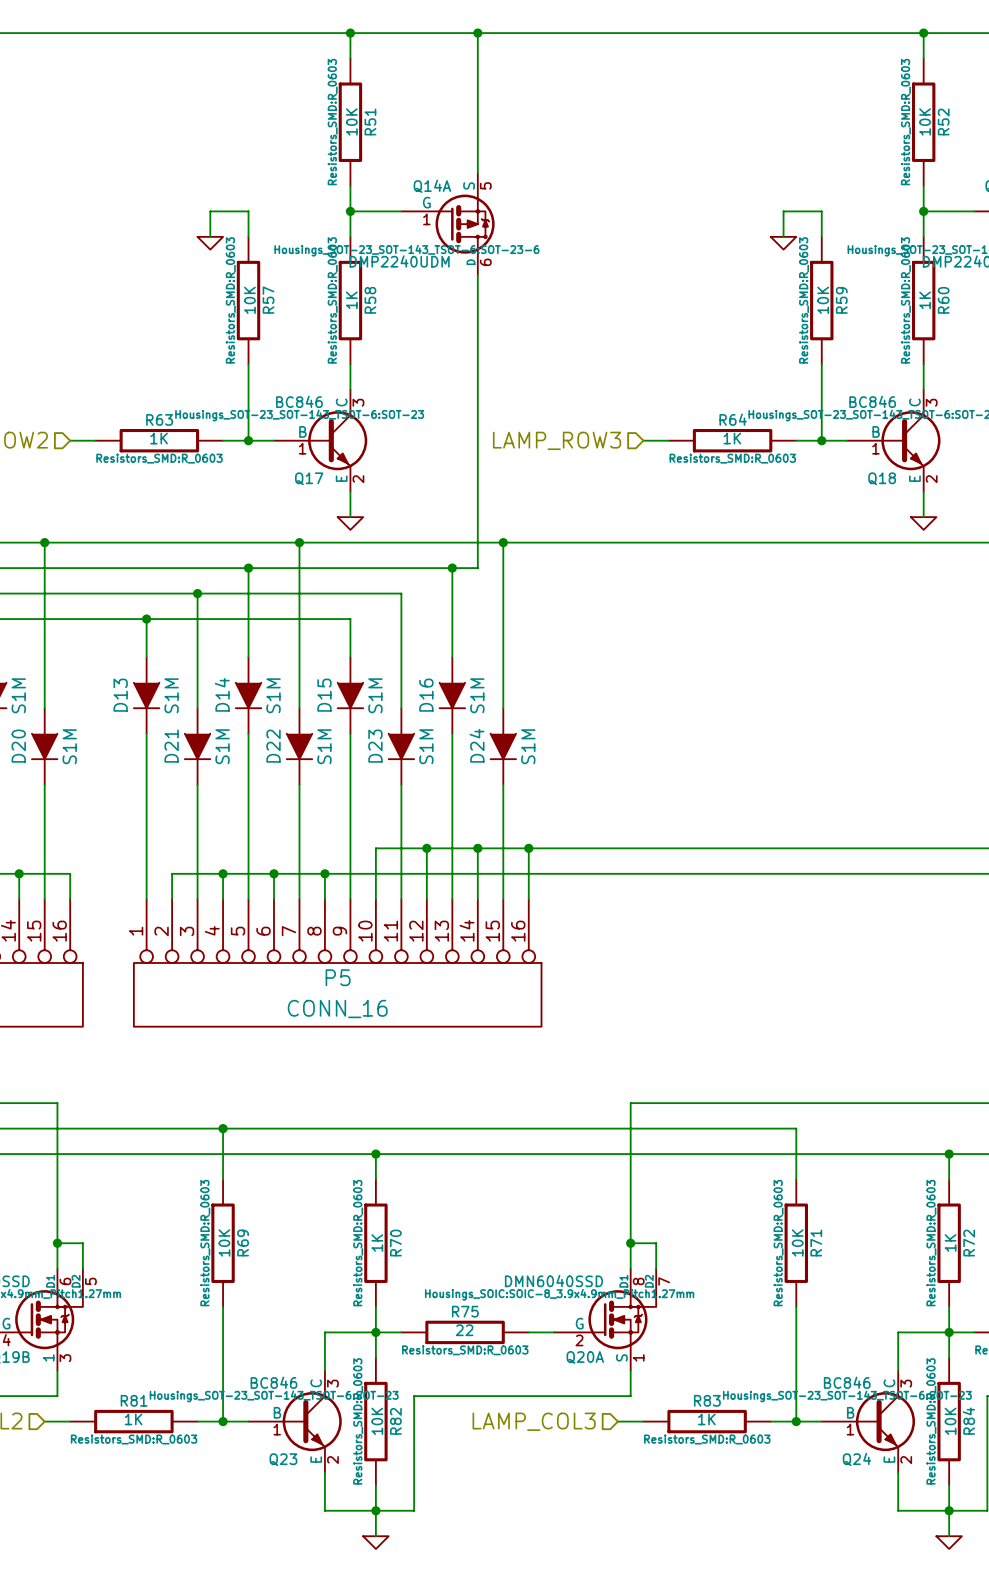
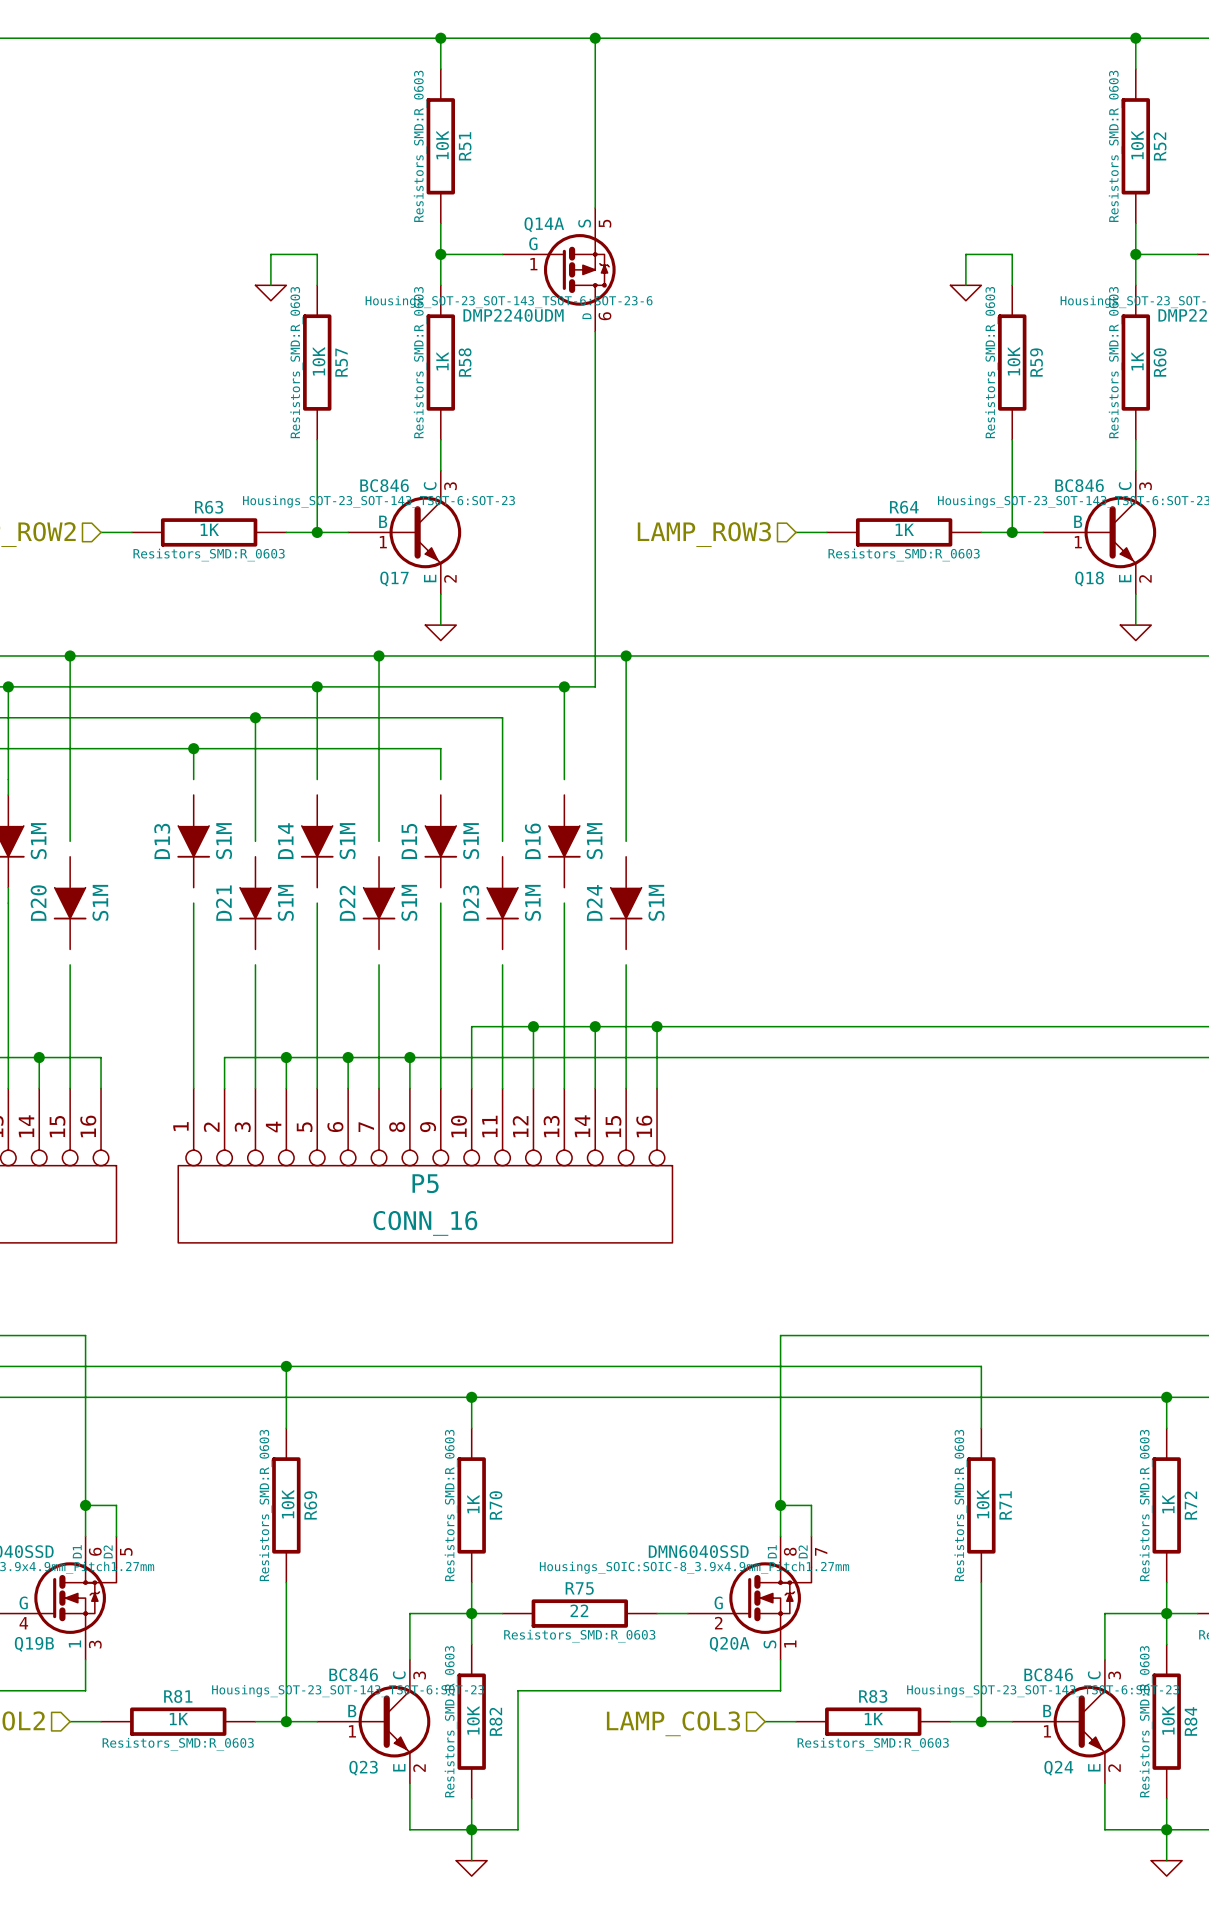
wire: (146, 644) (146, 657) -> none
wire: (248, 644) (248, 657) -> none
wire: (350, 644) (350, 657) -> none
wire: (452, 644) (452, 657) -> none
wire: (44, 695) (44, 708) -> none
wire: (197, 695) (197, 708) -> none
wire: (299, 695) (299, 708) -> none
wire: (401, 695) (401, 708) -> none
wire: (503, 695) (503, 708) -> none
wire: (146, 733) (146, 746) -> none
wire: (248, 733) (248, 746) -> none
wire: (350, 733) (350, 746) -> none
wire: (452, 733) (452, 746) -> none
wire: (44, 784) (44, 797) -> none
wire: (197, 784) (197, 797) -> none
wire: (299, 784) (299, 797) -> none
wire: (401, 784) (401, 797) -> none
wire: (503, 784) (503, 797) -> none

